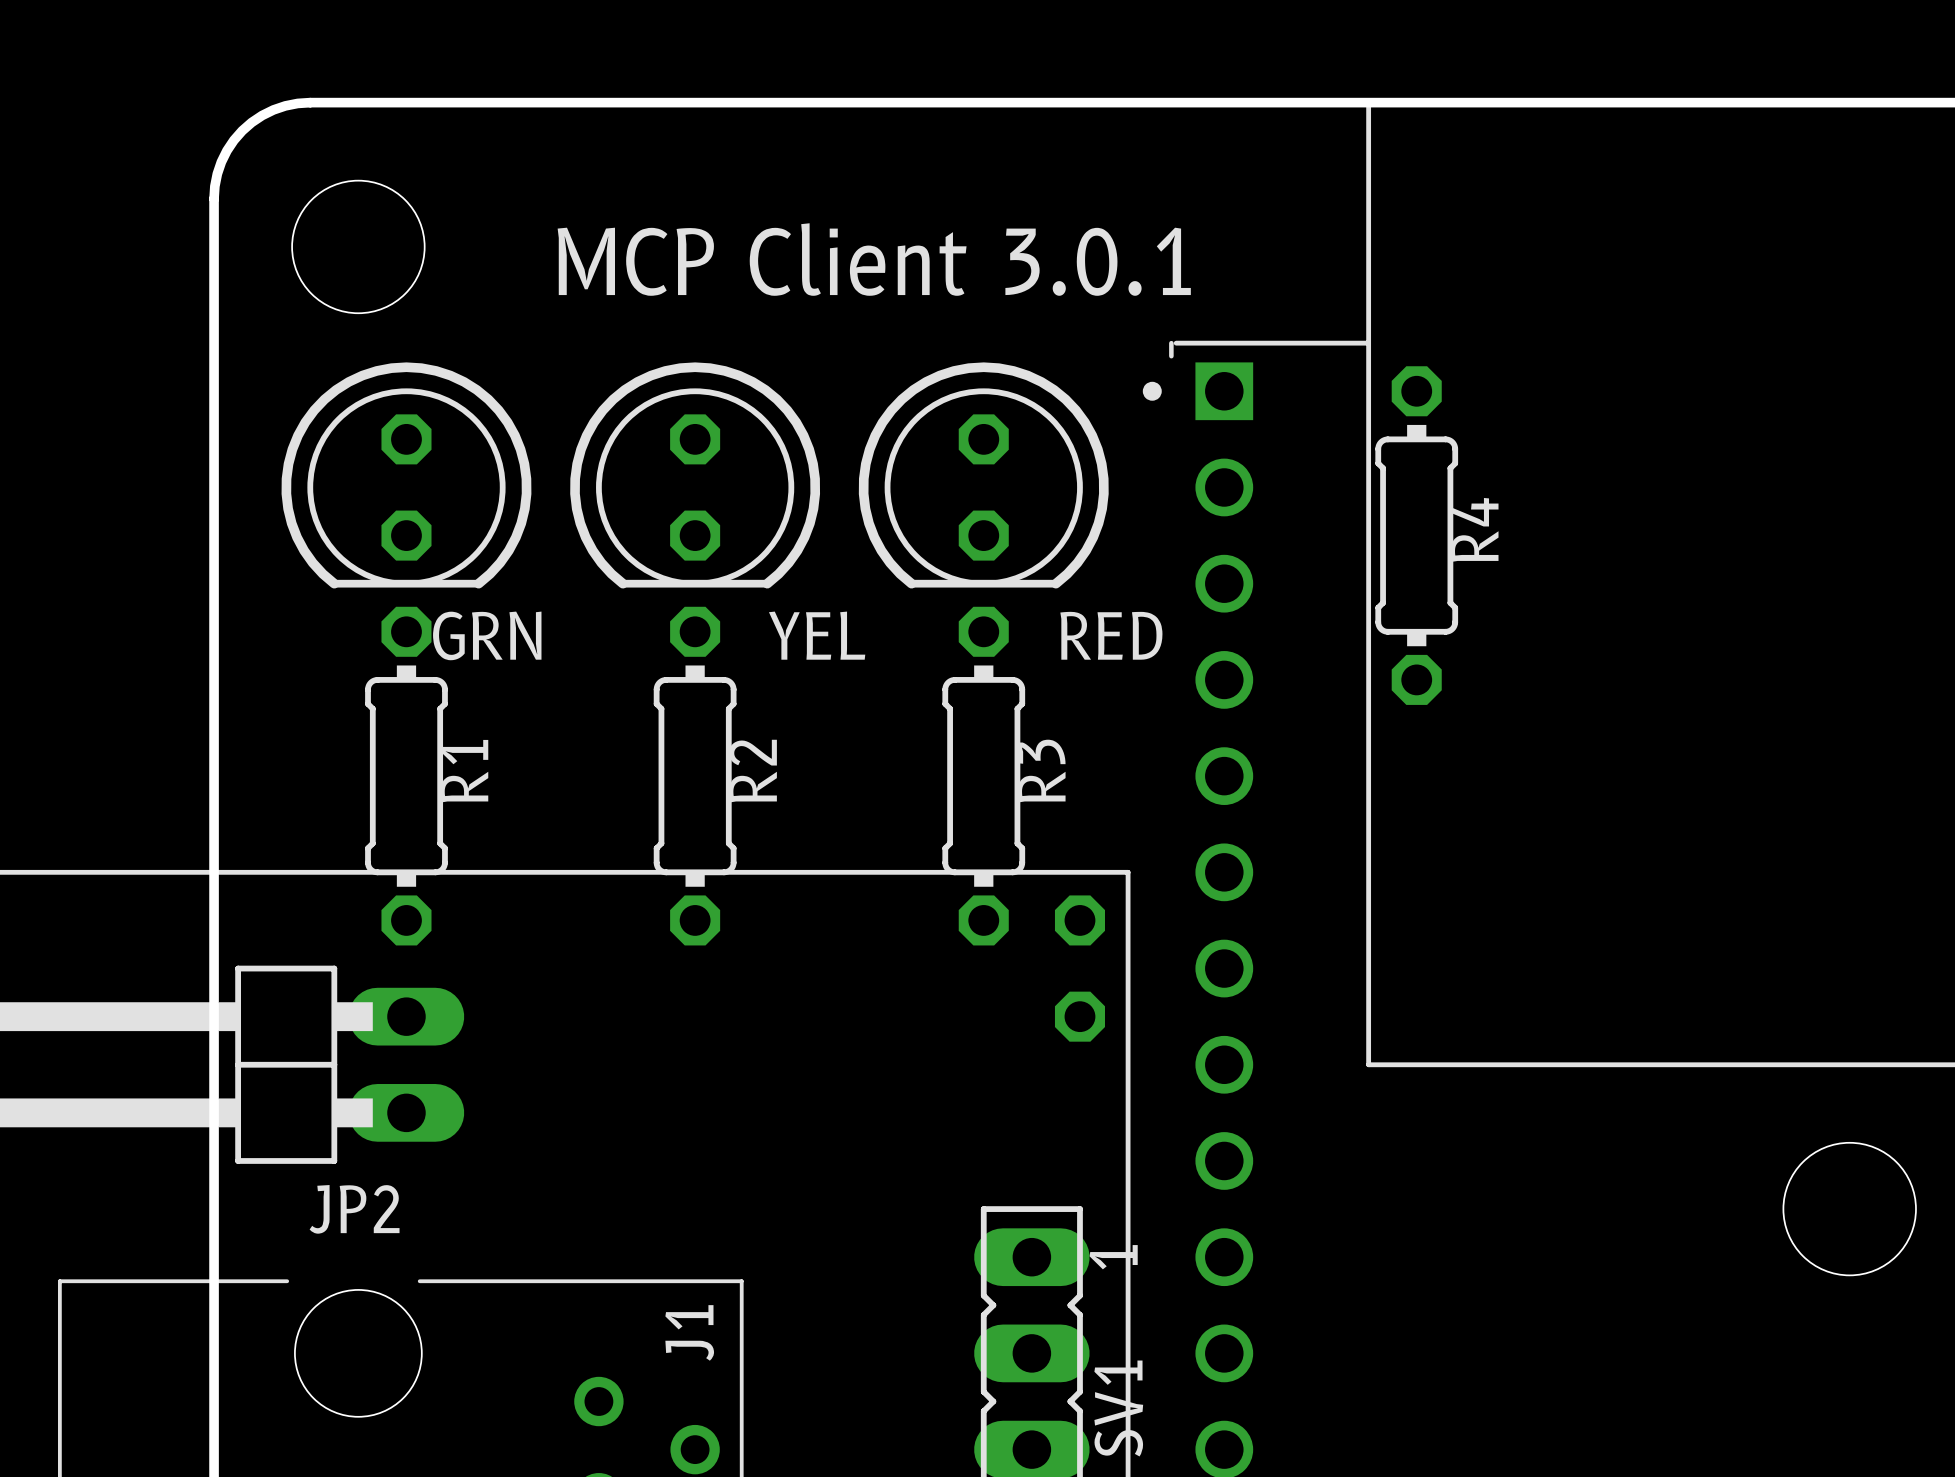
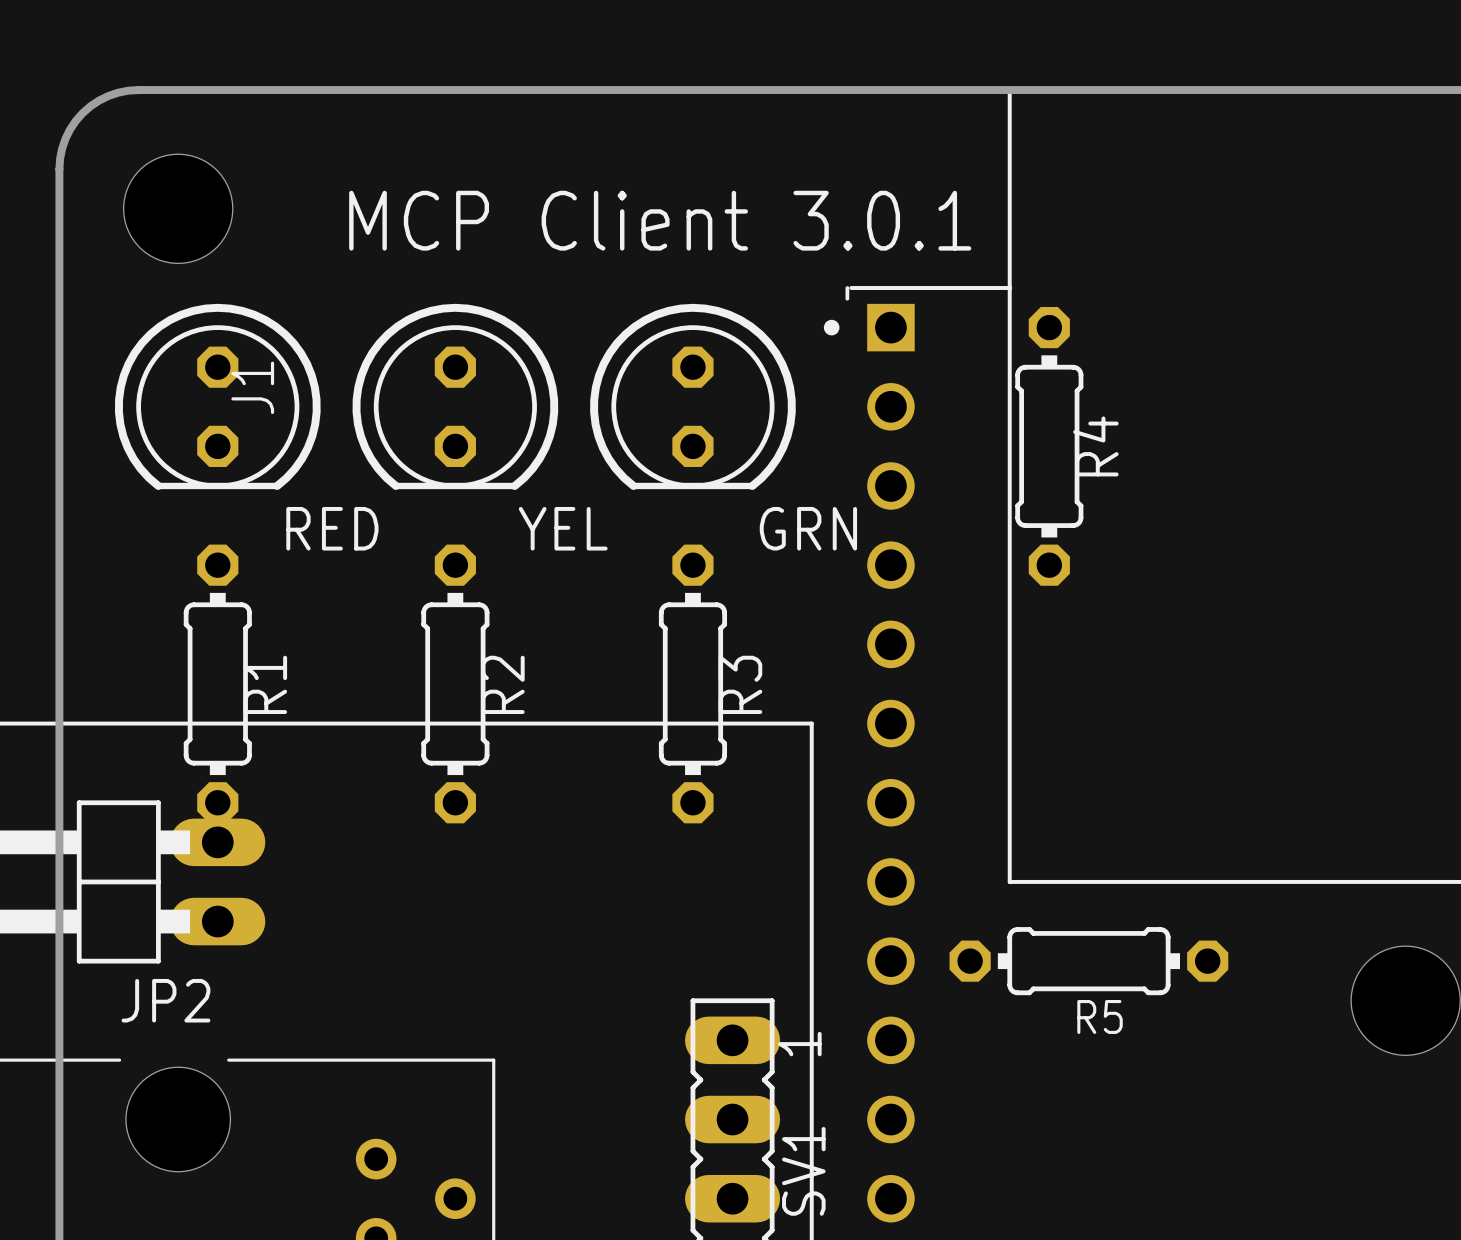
GRN name: GRN (487, 635) -> RED (332, 528)
RED name: RED (1111, 635) -> GRN (808, 528)
R1 position: (406, 776) -> (217, 683)
R2 position: (695, 776) -> (455, 683)
R3 position: (983, 776) -> (692, 683)
part: (1079, 968) -> none
R5: none -> (1088, 961)
J1 name position: J1 (689, 1332) -> J1 (252, 387)

